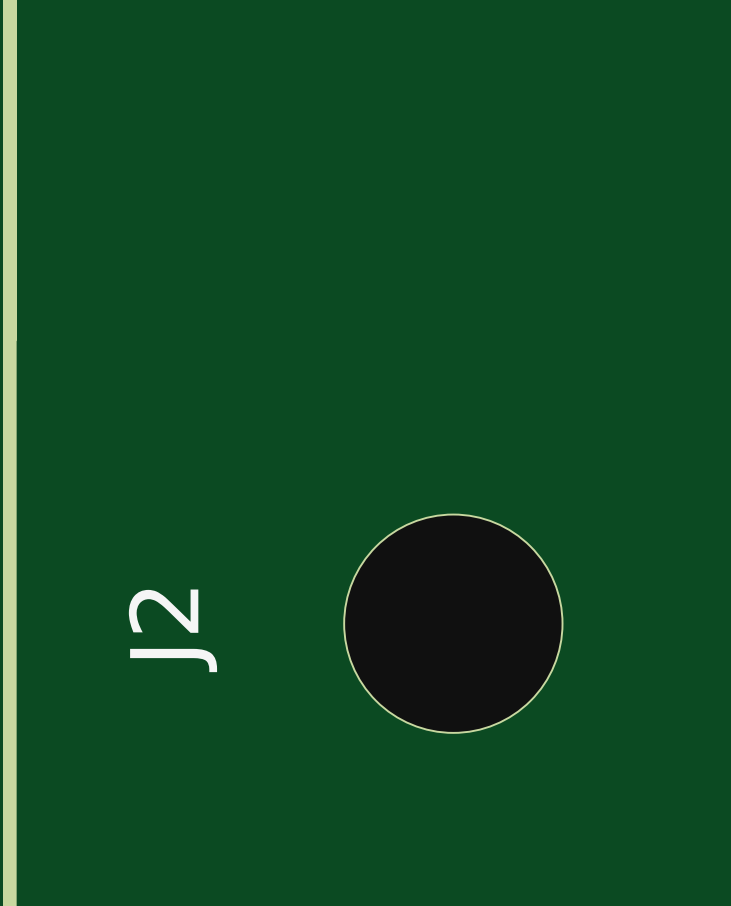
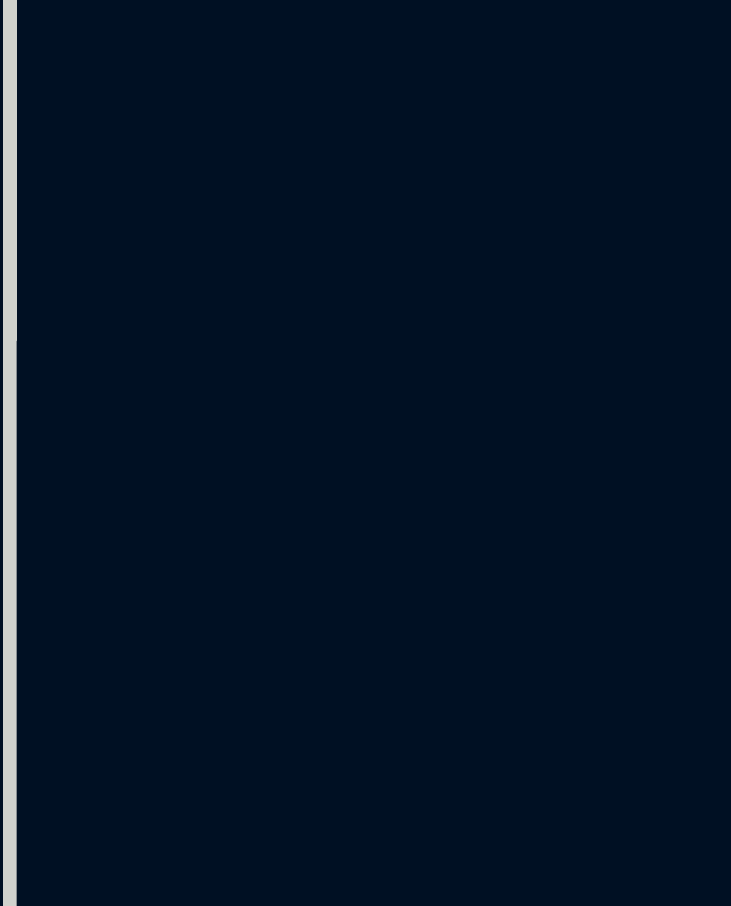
J2: (453, 623) -> none

